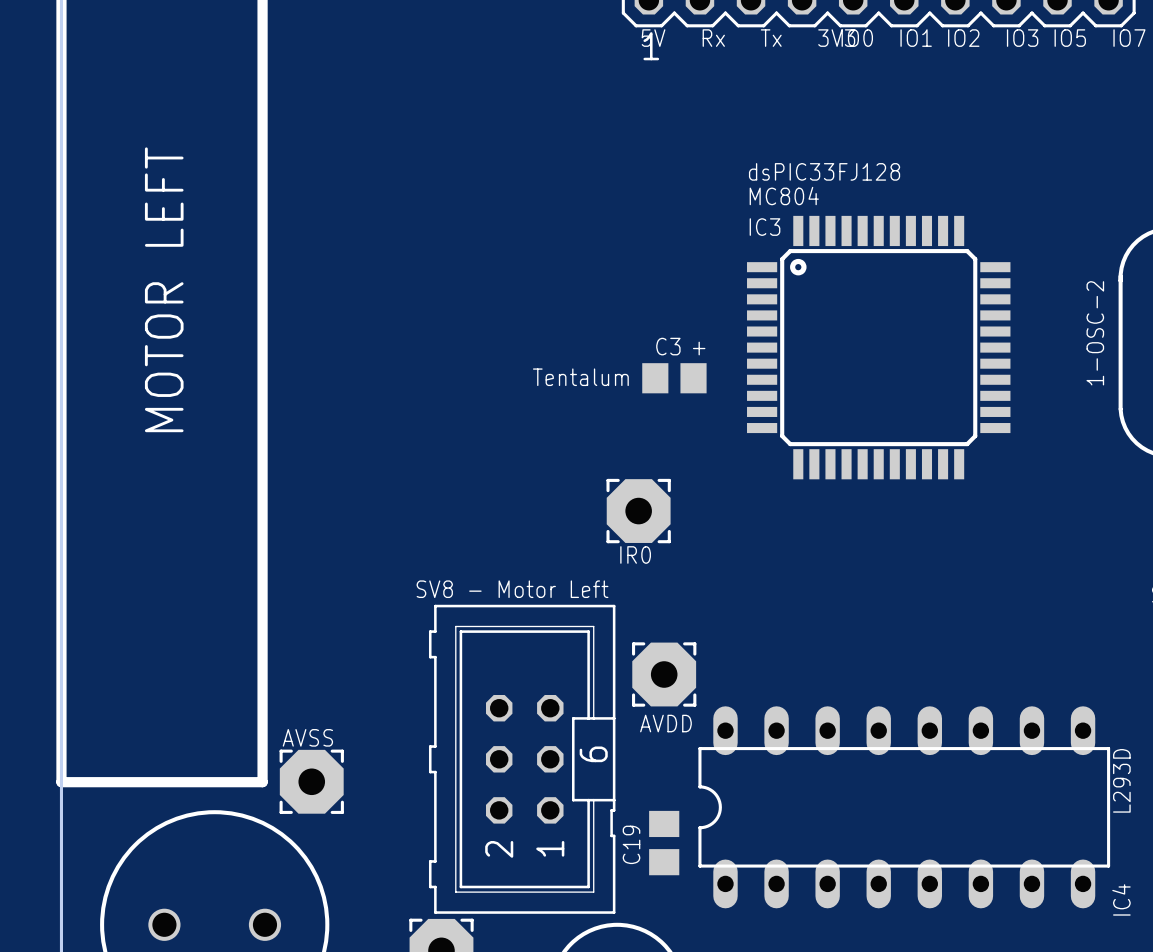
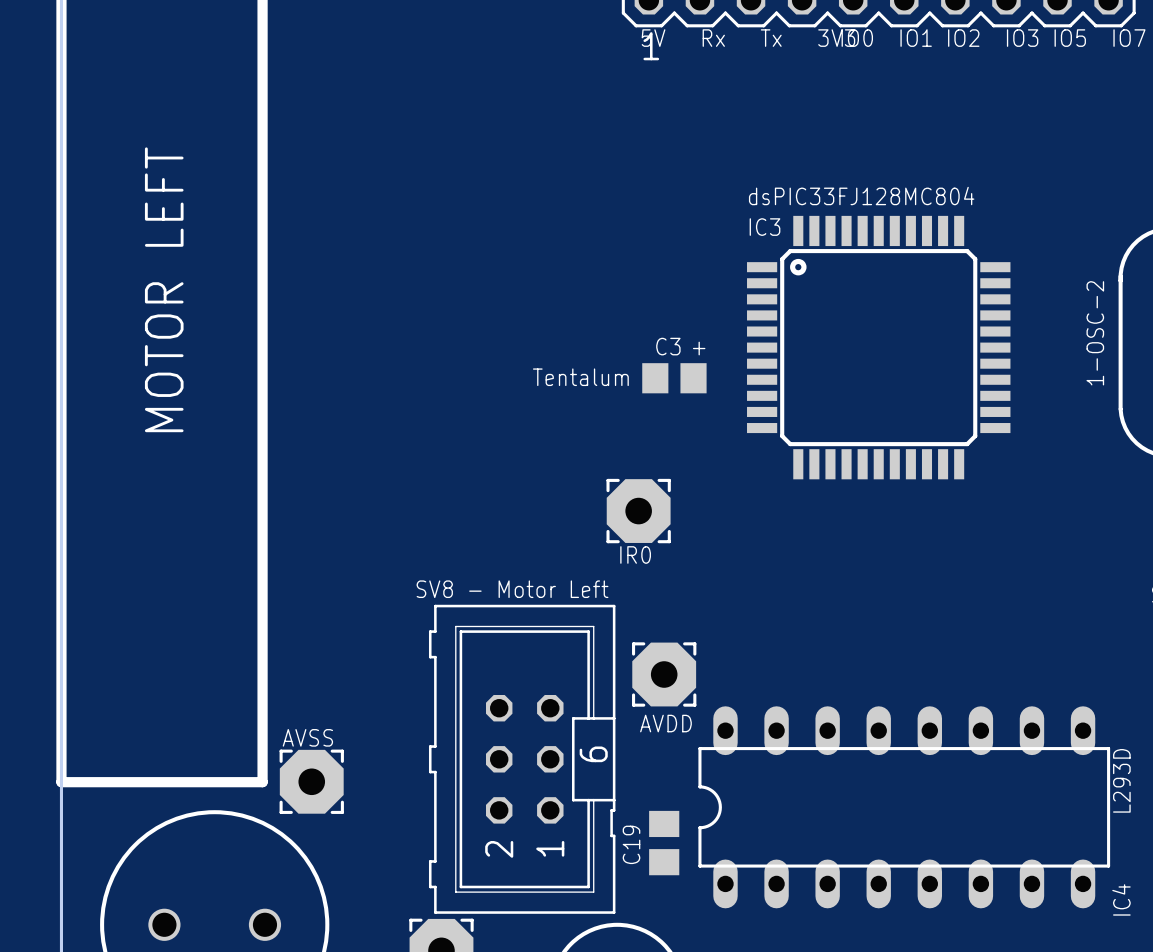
text: dsPIC33FJ128 (824, 171) -> none
text: MC804 (784, 196) -> dsPIC33FJ128MC804 (861, 196)

